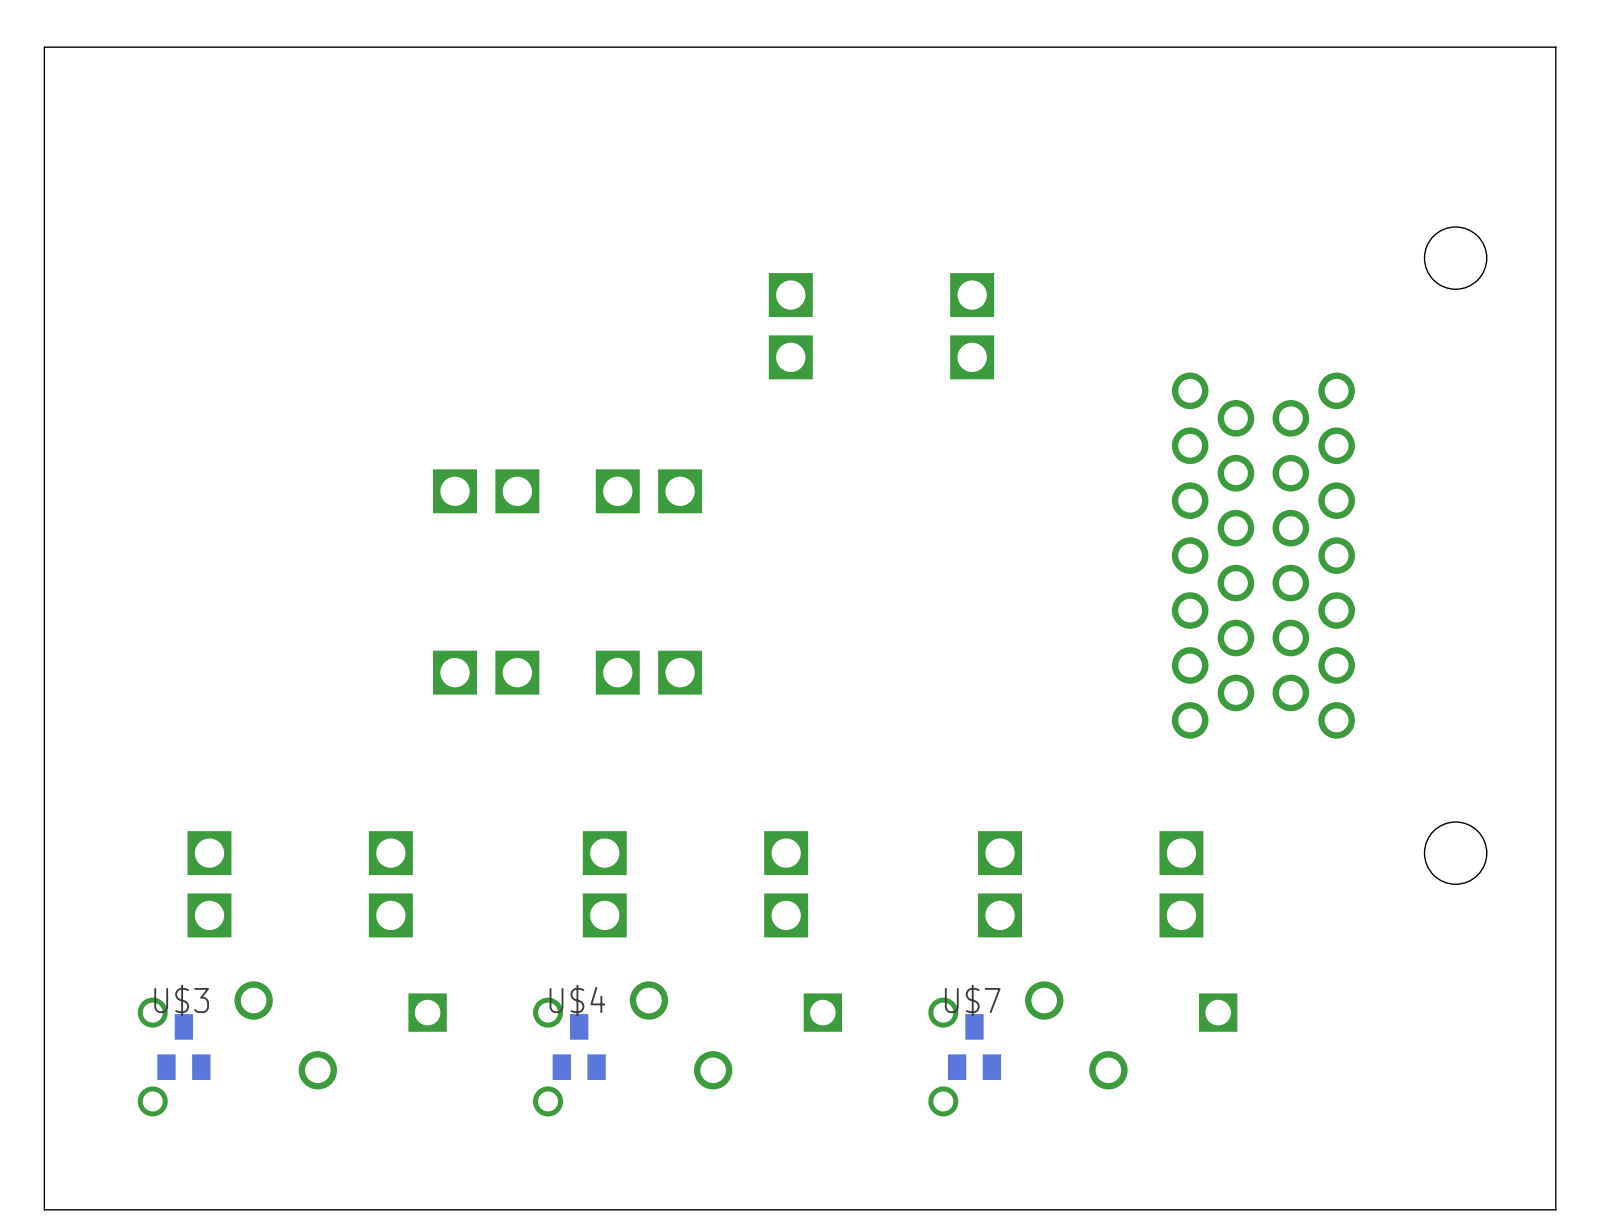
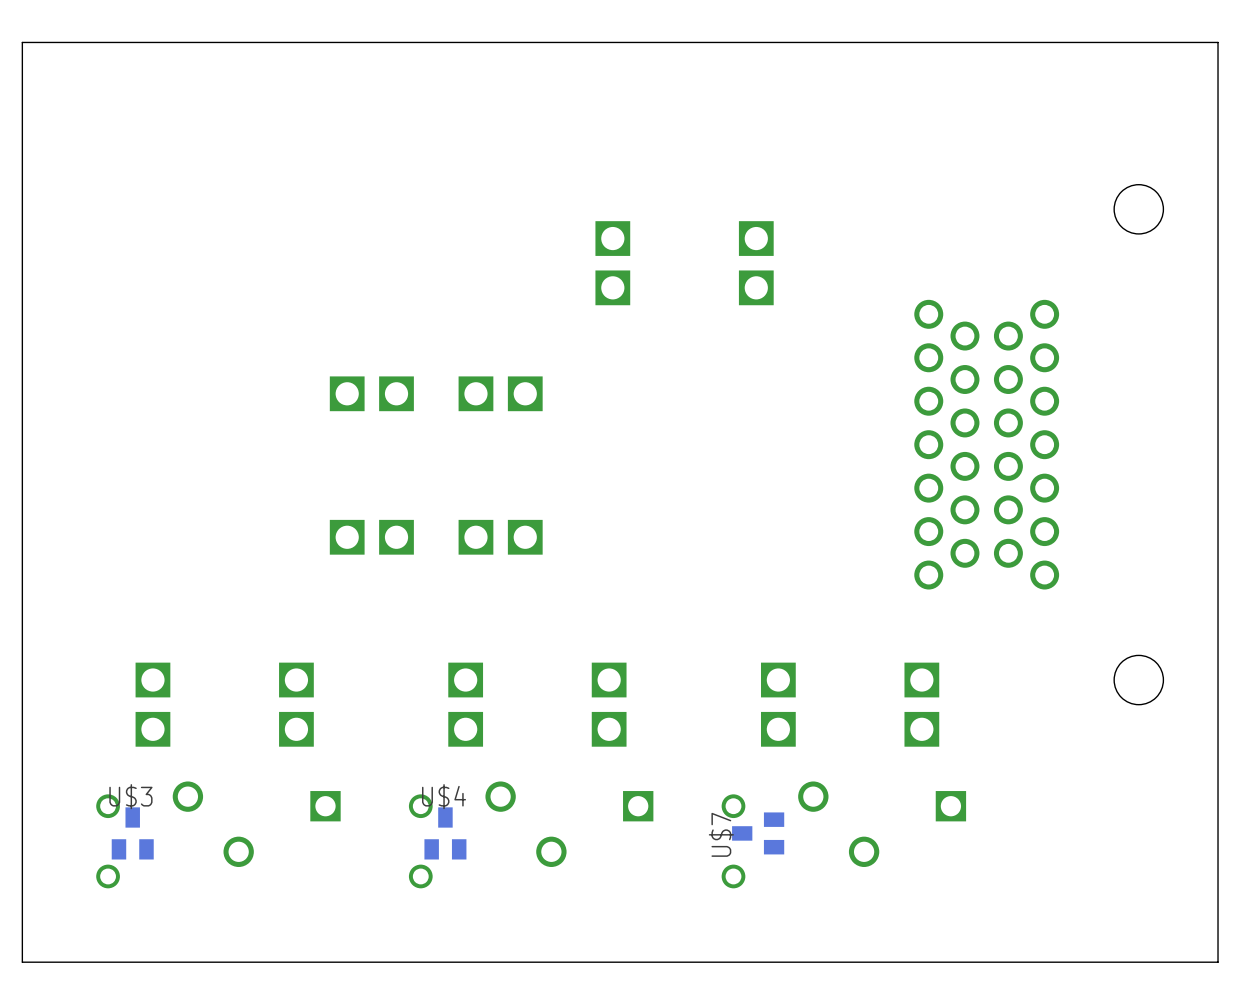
U$7 rotation: 0° (974, 1047) -> 90° counterclockwise (758, 833)

